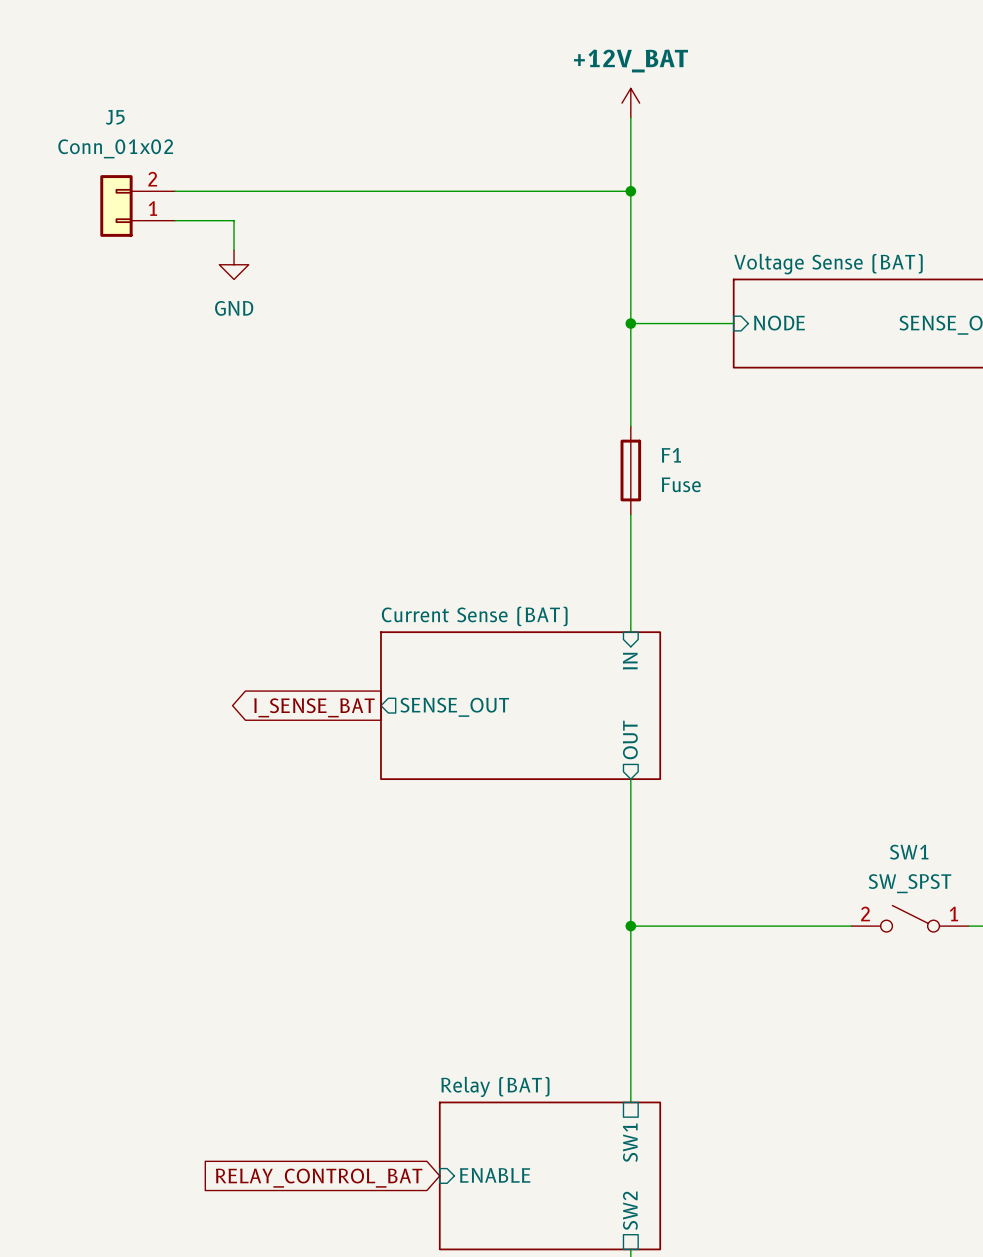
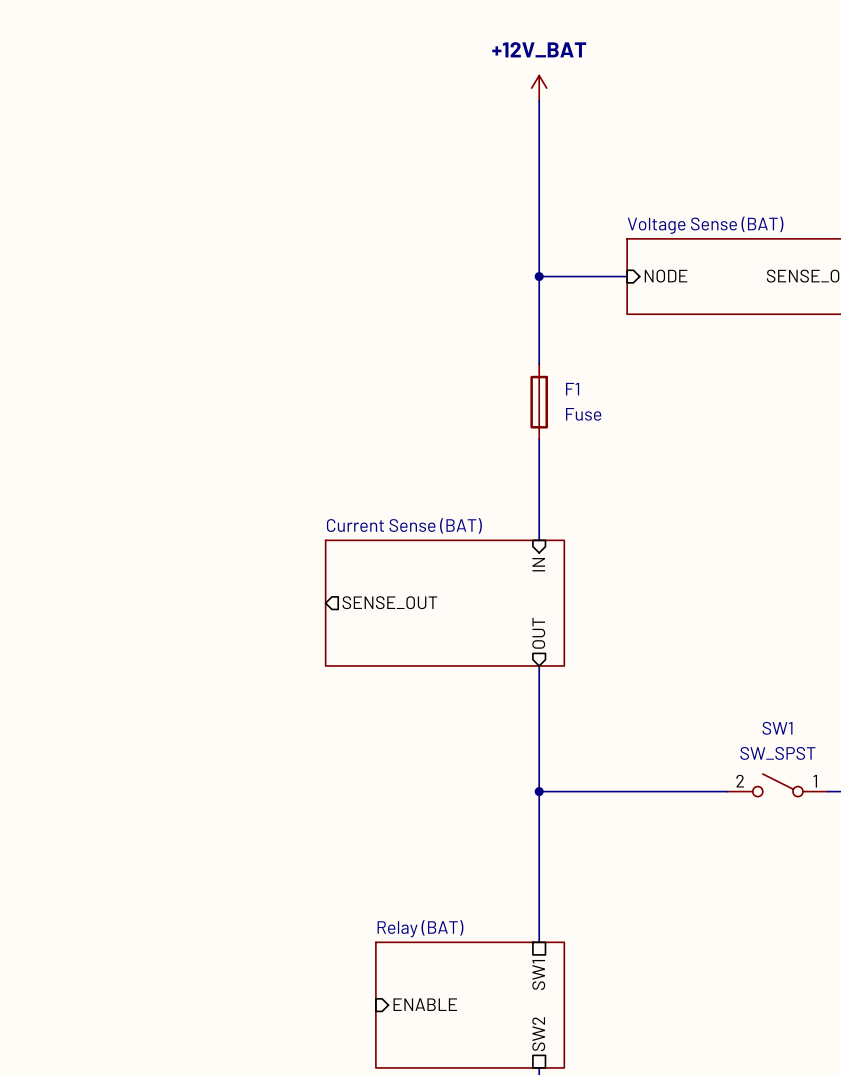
wire: (175, 191) (630, 191) -> none
junction: (630, 191) -> none
J5: Conn_01x02 (137, 205) -> none
wire: (175, 220) (234, 220) (234, 250) -> none
power symbol: GND (234, 264) -> none
global label: I_SENSE_BAT (314, 707) -> none
global label: RELAY_CONTROL_BAT (319, 1178) -> none

